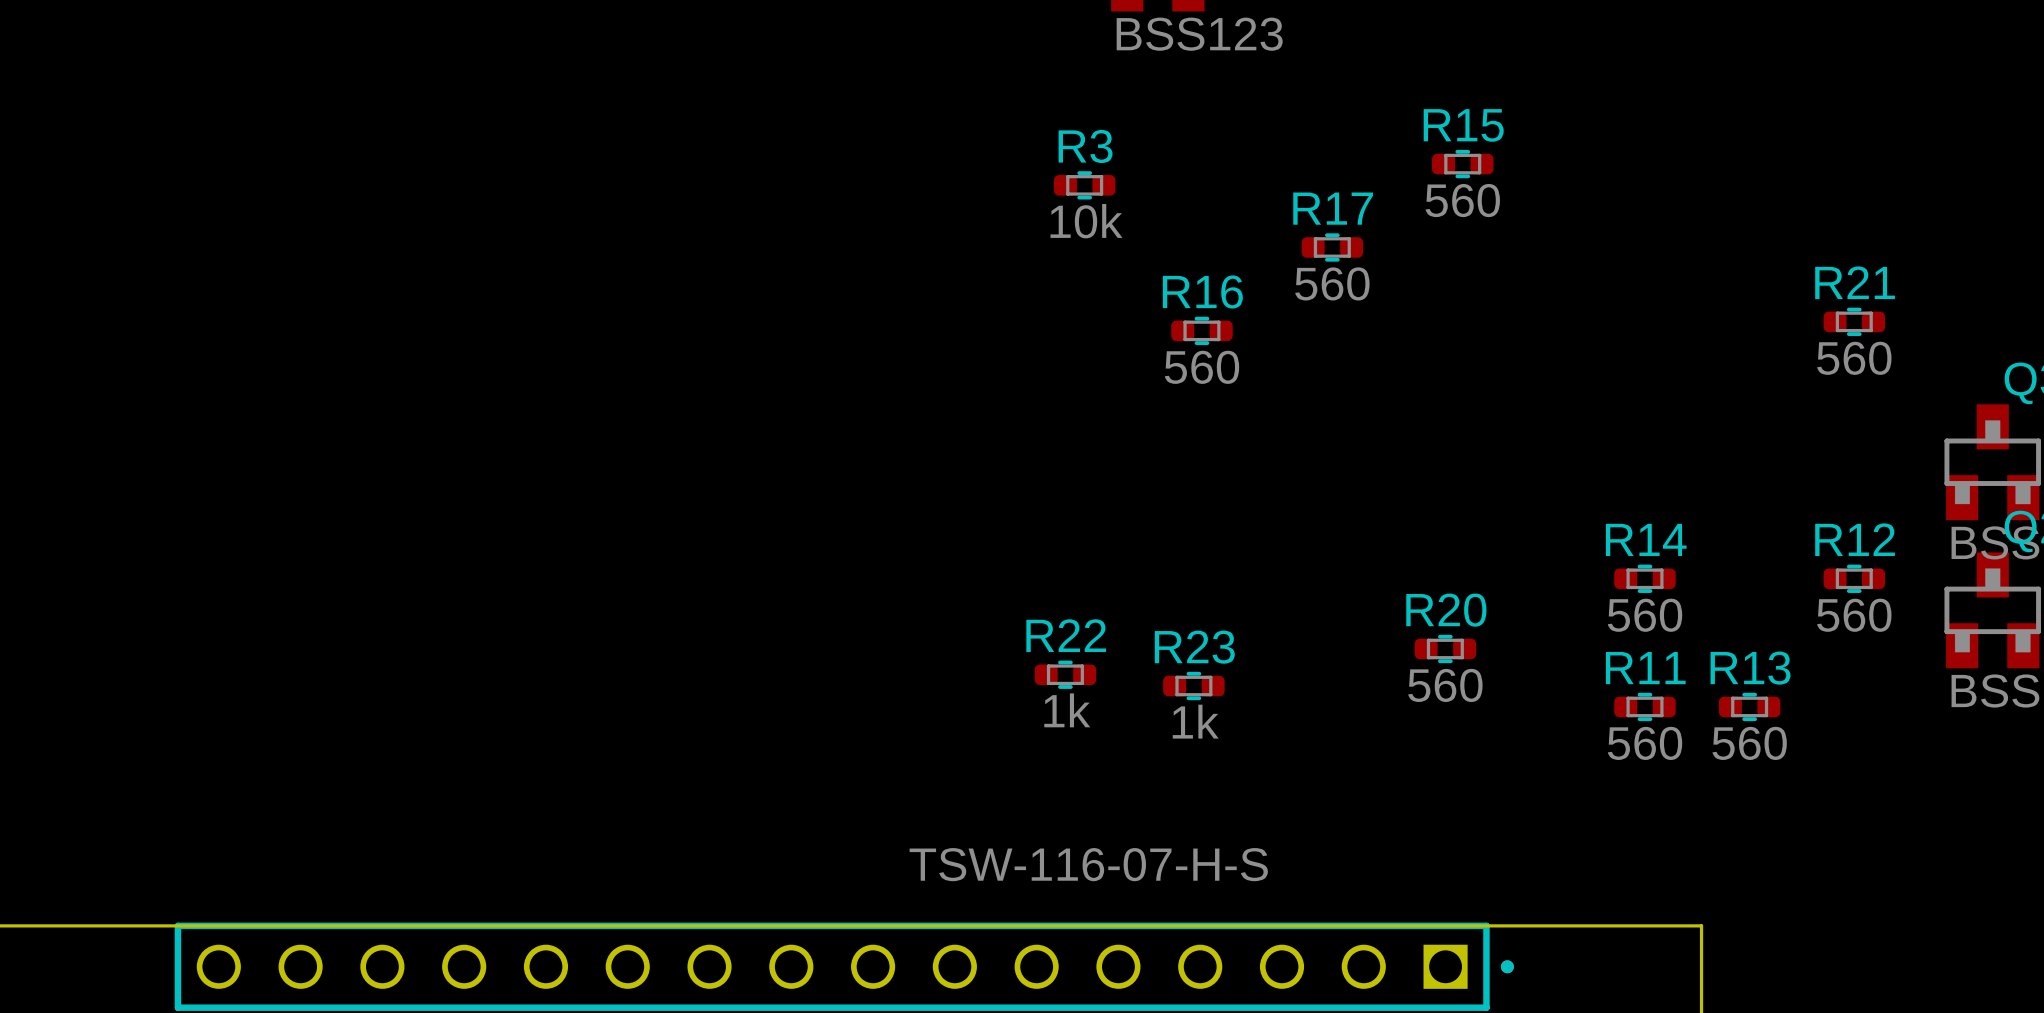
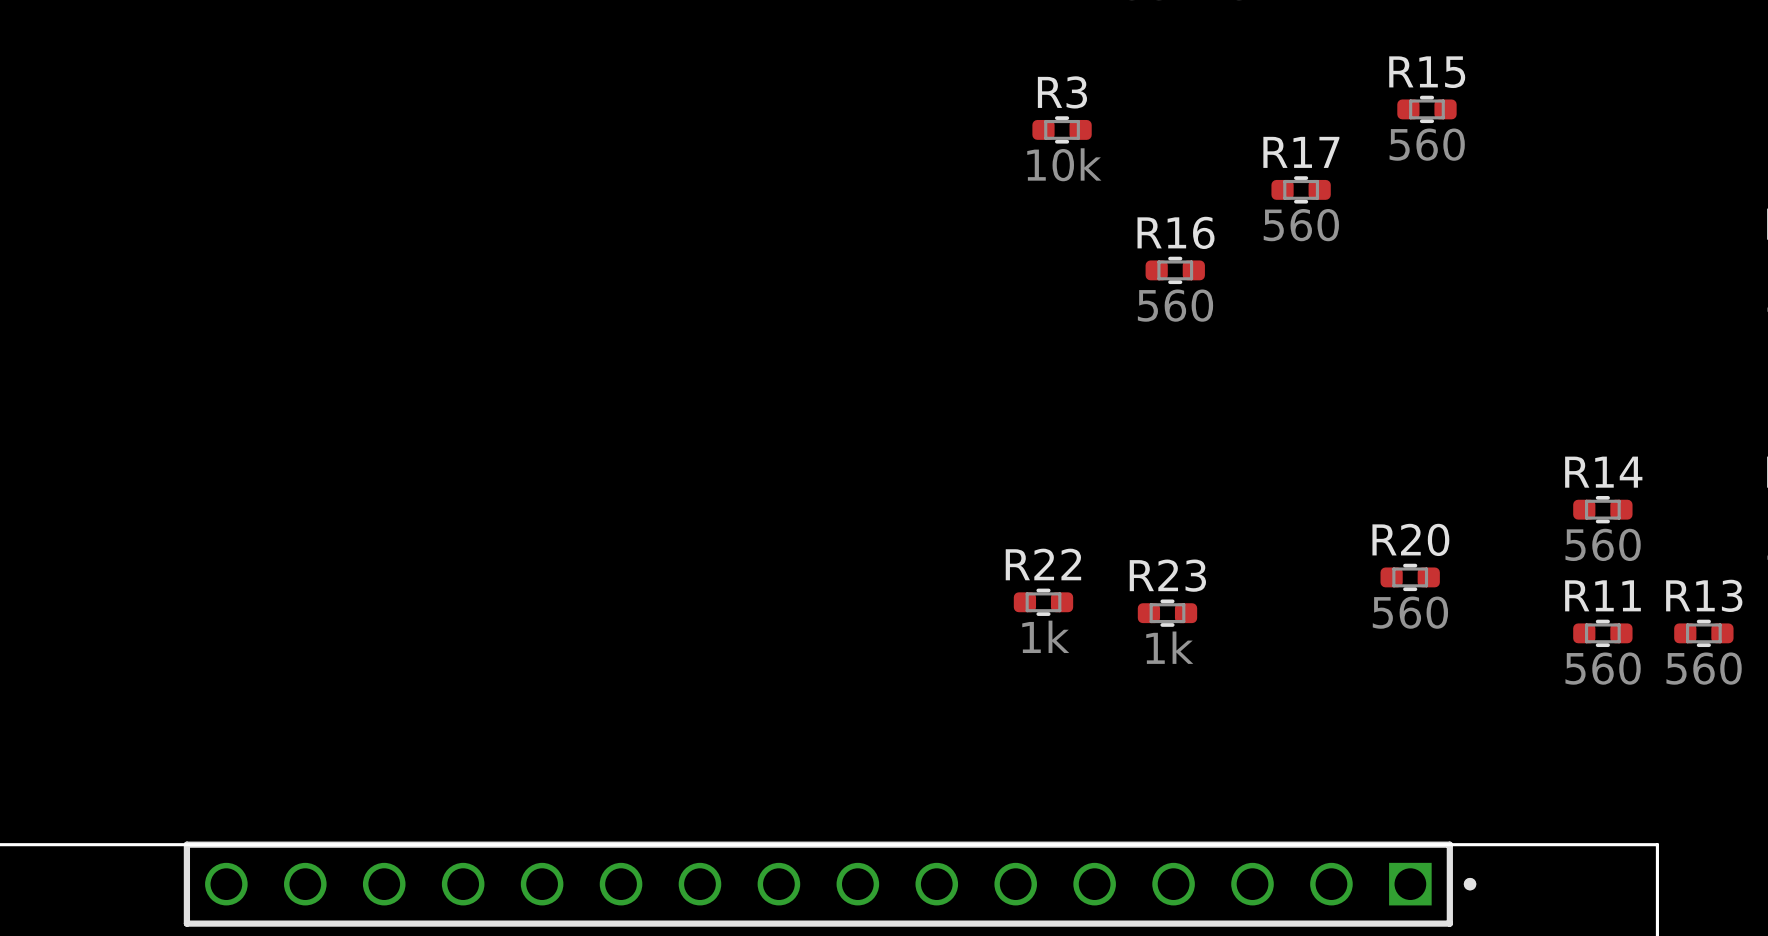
part value: TSW-116-07-H-S (1088, 864) -> none

